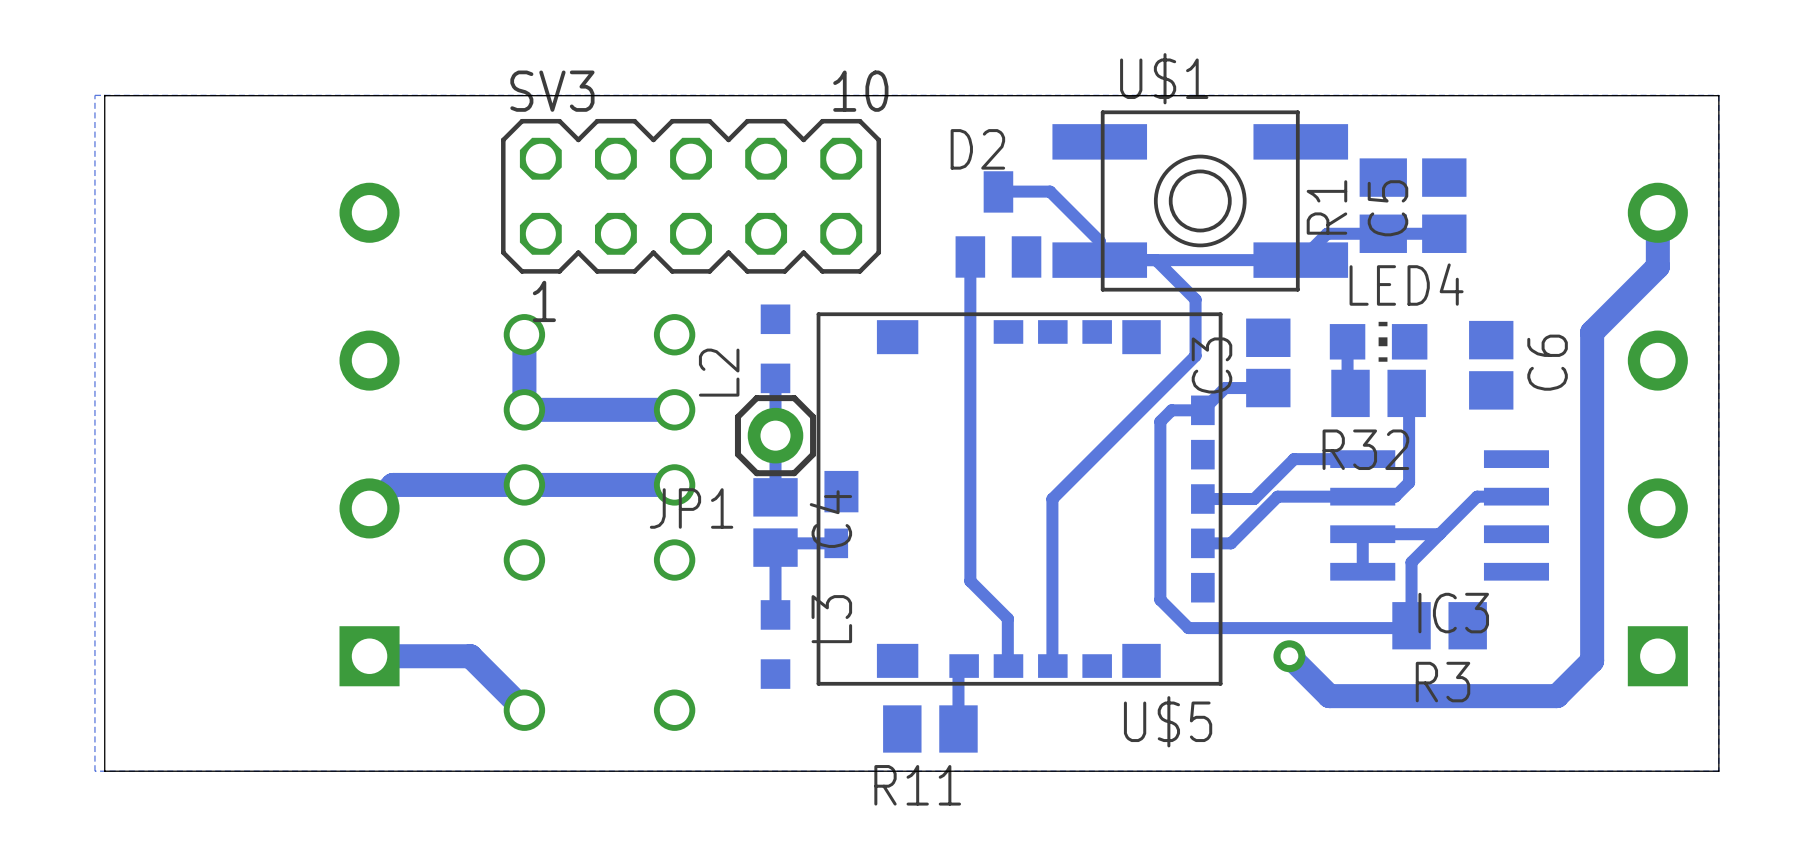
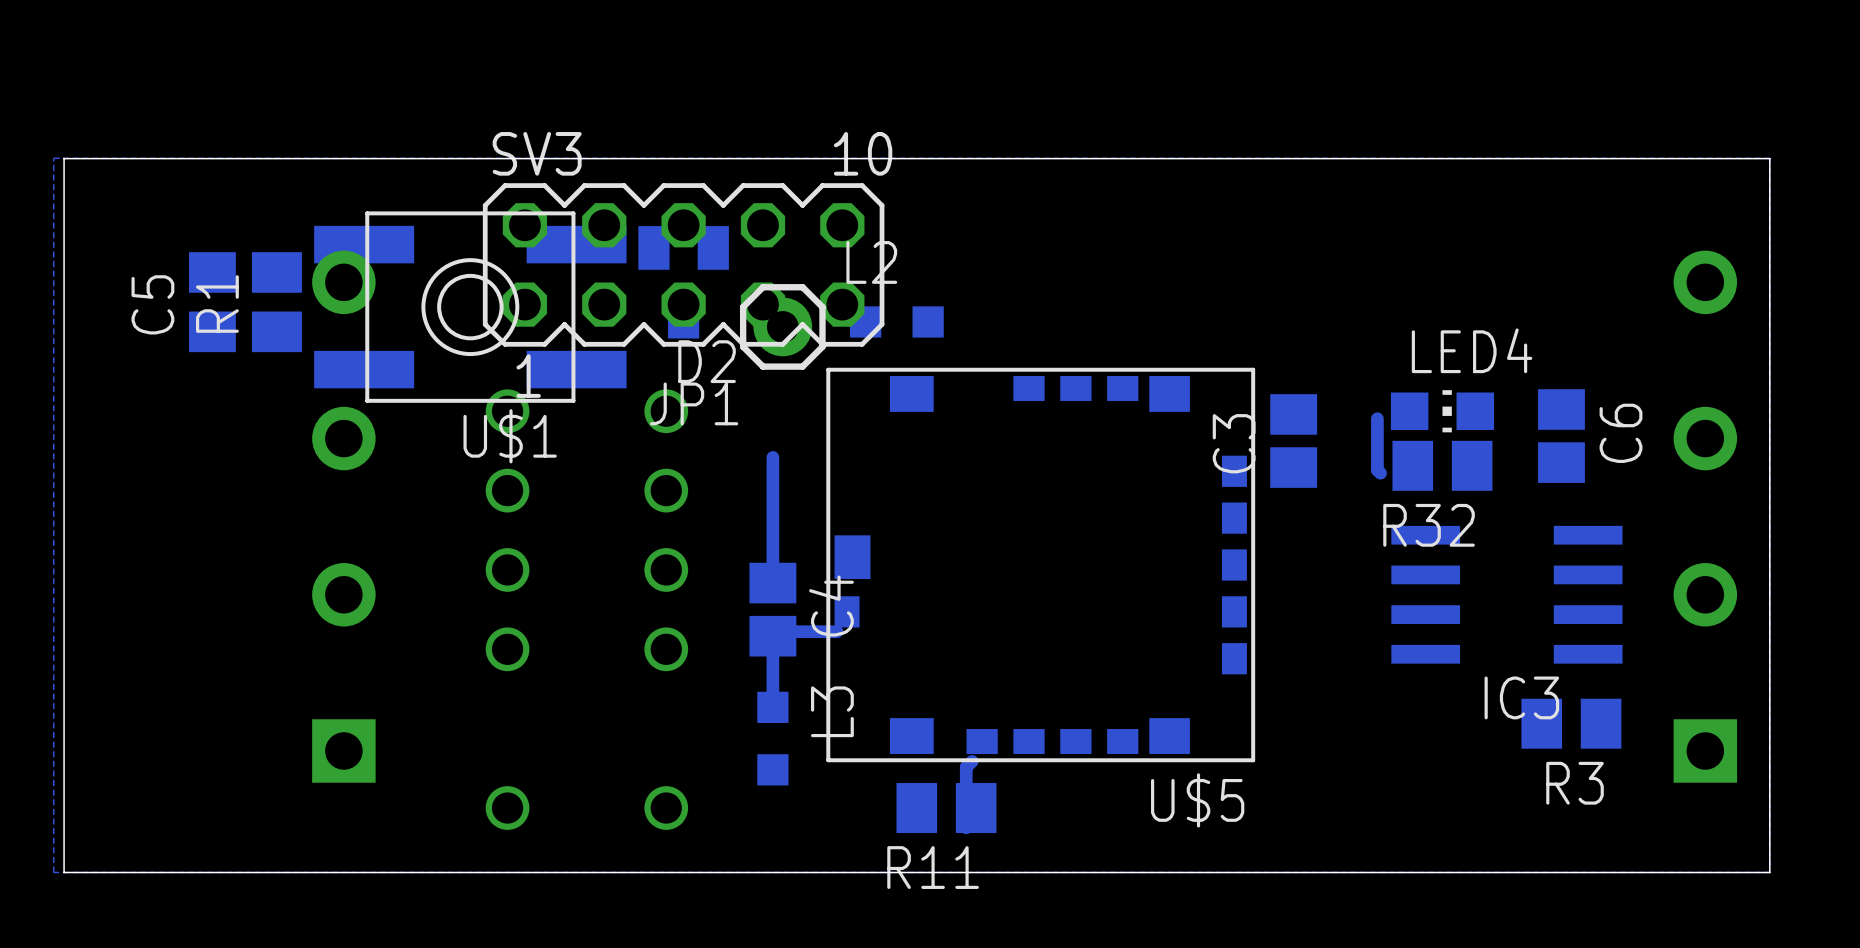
U$1 name position: U$1 (1164, 78) -> U$1 (510, 436)
track: (998, 191) (1050, 191) (1099, 241) (1099, 260) (1300, 260) (1327, 233) (1444, 233) -> none
U$1 position: (1200, 200) -> (470, 307)
R1 position: (1383, 205) -> (276, 302)
C5 position: (1444, 205) -> (212, 302)
track: (1657, 212) (1657, 266) (1592, 332) (1592, 660) (1556, 696) (1329, 696) (1289, 656) -> none
D2 rotation: 0° (998, 224) -> 180° (683, 282)
D2 position: (998, 224) -> (683, 282)
track: (970, 256) (970, 581) (1007, 618) (1008, 666) -> none
track: (1156, 260) (1195, 299) (1195, 355) (1052, 499) (1052, 665) -> none
track: (524, 334) (524, 409) (674, 409) -> none
LED4 position: (1378, 341) -> (1442, 411)
L2 rotation: 0° (775, 348) -> 90° clockwise (896, 321)
L2 position: (775, 348) -> (896, 321)
C6 position: (1491, 365) -> (1561, 436)
track: (1268, 388) (1225, 388) (1202, 410) (1171, 410) (1160, 421) (1160, 599) (1188, 628) (1409, 628) (1411, 625) (1411, 562) (1477, 496) (1516, 496) -> none
R32 position: (1378, 393) -> (1442, 465)
track: (1406, 393) (1409, 395) (1409, 482) (1395, 496) (1277, 496) (1231, 543) (1202, 543) -> none
JP1 position: (775, 435) -> (782, 326)
track: (1362, 459) (1294, 459) (1254, 499) (1202, 499) -> none
track: (674, 484) (393, 484) (369, 508) -> none
U$5 position: (1019, 499) -> (1040, 565)
IC3 position: (1439, 515) -> (1506, 594)
track: (1439, 534) (1362, 534) (1362, 571) -> none
R3 position: (1439, 625) -> (1571, 723)
track: (369, 656) (470, 656) (524, 710) -> none
via: (1289, 656) -> none
R11 position: (930, 728) -> (946, 808)

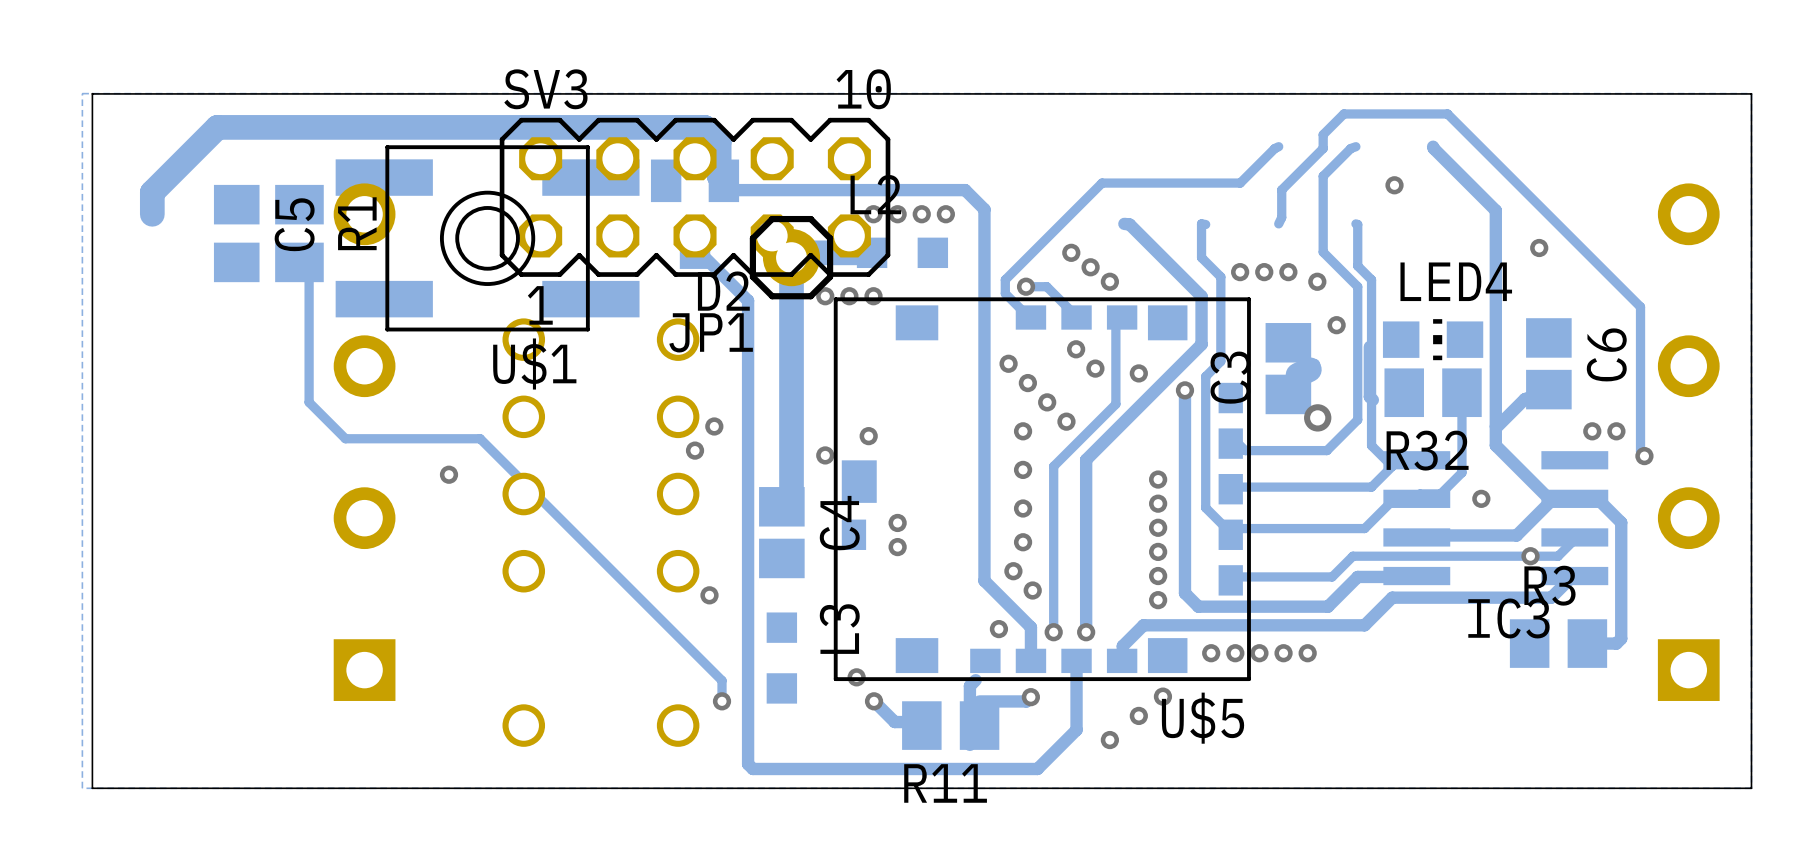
track: none -> (1278, 146) (1240, 183) (1102, 183) (1005, 279) (1005, 293) (1030, 317)
track: none -> (1355, 146) (1350, 148) (1323, 176) (1323, 252) (1357, 286) (1357, 419) (1326, 450) (1245, 450) (1233, 438) (1230, 443)
track: none -> (1433, 146) (1495, 210) (1495, 445) (1551, 500)
via: none -> (1394, 185)
track: none -> (152, 214) (152, 192) (217, 127) (704, 127) (719, 141) (719, 176) (733, 190) (965, 190) (984, 209) (984, 580) (1030, 627) (1030, 660)
via: none -> (873, 214)
via: none -> (897, 214)
via: none -> (921, 214)
via: none -> (945, 214)
track: none -> (1124, 223) (1129, 224) (1201, 296) (1201, 344) (1086, 459) (1086, 632)
track: none -> (1205, 224) (1201, 223) (1201, 257) (1220, 276) (1220, 361) (1205, 376) (1205, 507) (1230, 534) (1233, 528) (1364, 528) (1392, 500) (1413, 500) (1419, 494) (1440, 494) (1461, 472) (1461, 392)
track: none -> (1278, 223) (1281, 217) (1281, 189) (1323, 148) (1323, 134) (1343, 113) (1447, 113) (1640, 306) (1640, 452) (1644, 456)
track: none -> (1355, 223) (1357, 224) (1357, 265) (1371, 279) (1371, 445) (1392, 466) (1371, 487) (1233, 487) (1230, 489)
C5 name position: C5 (152, 304) -> C5 (294, 224)
R1 name position: R1 (217, 304) -> R1 (357, 223)
track: none -> (695, 247) (748, 300) (748, 764) (752, 768) (1037, 768) (1076, 729) (1076, 660)
via: none -> (1539, 248)
track: none -> (872, 252) (796, 252) (791, 257) (791, 487)
via: none -> (1071, 252)
track: none -> (299, 262) (309, 274) (309, 402) (345, 438) (480, 438) (722, 680) (722, 701)
via: none -> (1090, 267)
via: none -> (1240, 272)
via: none -> (1264, 272)
via: none -> (1288, 272)
via: none -> (1109, 281)
via: none -> (1317, 281)
track: none -> (1026, 286) (1046, 286) (1076, 317)
via: none -> (1026, 286)
via: none -> (825, 296)
via: none -> (849, 296)
via: none -> (873, 296)
track: none -> (1122, 317) (1115, 321) (1115, 404) (1053, 466) (1053, 632)
via: none -> (1336, 325)
via: none -> (1076, 349)
via: none -> (1008, 363)
track: none -> (1314, 364) (1298, 375)
via: none -> (1095, 368)
via: none -> (1138, 373)
via: none -> (1027, 383)
track: (772, 457) (772, 583) -> none
track: none -> (1548, 389) (1524, 399) (1495, 426)
track: none -> (1184, 390) (1184, 593) (1198, 606) (1328, 606) (1357, 576) (1416, 576)
via: none -> (1184, 390)
via: none -> (1047, 402)
via: none -> (1317, 417)
via: none -> (1066, 421)
via: none -> (714, 426)
via: none -> (1023, 431)
via: none -> (1592, 431)
via: none -> (1616, 431)
via: none -> (868, 436)
via: none -> (695, 450)
via: none -> (825, 455)
via: none -> (1644, 456)
via: none -> (1023, 469)
via: none -> (449, 474)
via: none -> (1158, 479)
via: none -> (1481, 498)
track: none -> (1574, 498) (1578, 500) (1599, 500) (1621, 522) (1621, 638) (1616, 643) (1587, 643)
track: none -> (1551, 500) (1516, 535) (1419, 535) (1416, 537)
via: none -> (1158, 503)
via: none -> (1023, 508)
via: none -> (897, 522)
via: none -> (1158, 527)
track: none -> (1574, 537) (1558, 556) (1352, 556) (1332, 576) (1233, 576) (1230, 580)
via: none -> (1023, 542)
via: none -> (897, 547)
via: none -> (1158, 551)
track: (837, 631) (777, 631) (772, 636) (772, 707) -> none
via: none -> (1530, 556)
via: none -> (1013, 571)
via: none -> (1158, 576)
track: none -> (1574, 576) (1551, 597) (1392, 597) (1364, 625) (1143, 625) (1122, 646) (1122, 660)
via: none -> (1032, 590)
via: none -> (709, 595)
via: none -> (1158, 600)
via: none -> (998, 629)
via: none -> (1053, 632)
via: none -> (1086, 632)
via: none -> (1211, 653)
via: none -> (1235, 653)
via: none -> (1259, 653)
via: none -> (1283, 653)
via: none -> (1307, 653)
via: none -> (856, 677)
track: none -> (1030, 697) (1026, 701) (979, 701)
via: none -> (1030, 697)
via: none -> (1162, 696)
via: none -> (722, 701)
track: none -> (874, 701) (894, 722) (915, 722) (921, 725)
via: none -> (874, 701)
R3 name position: R3 (1575, 783) -> R3 (1549, 585)
via: none -> (1138, 715)
via: none -> (1109, 740)

